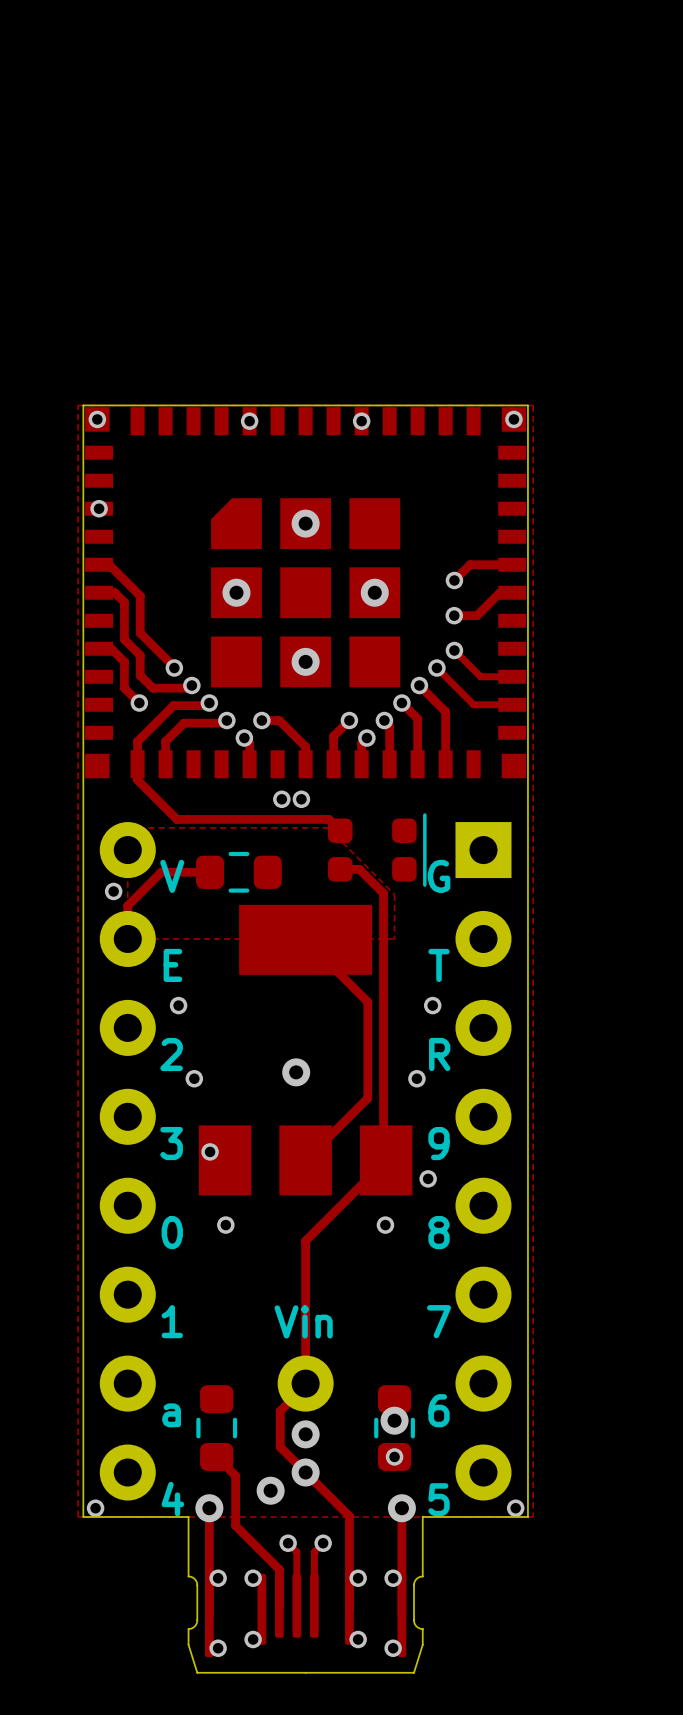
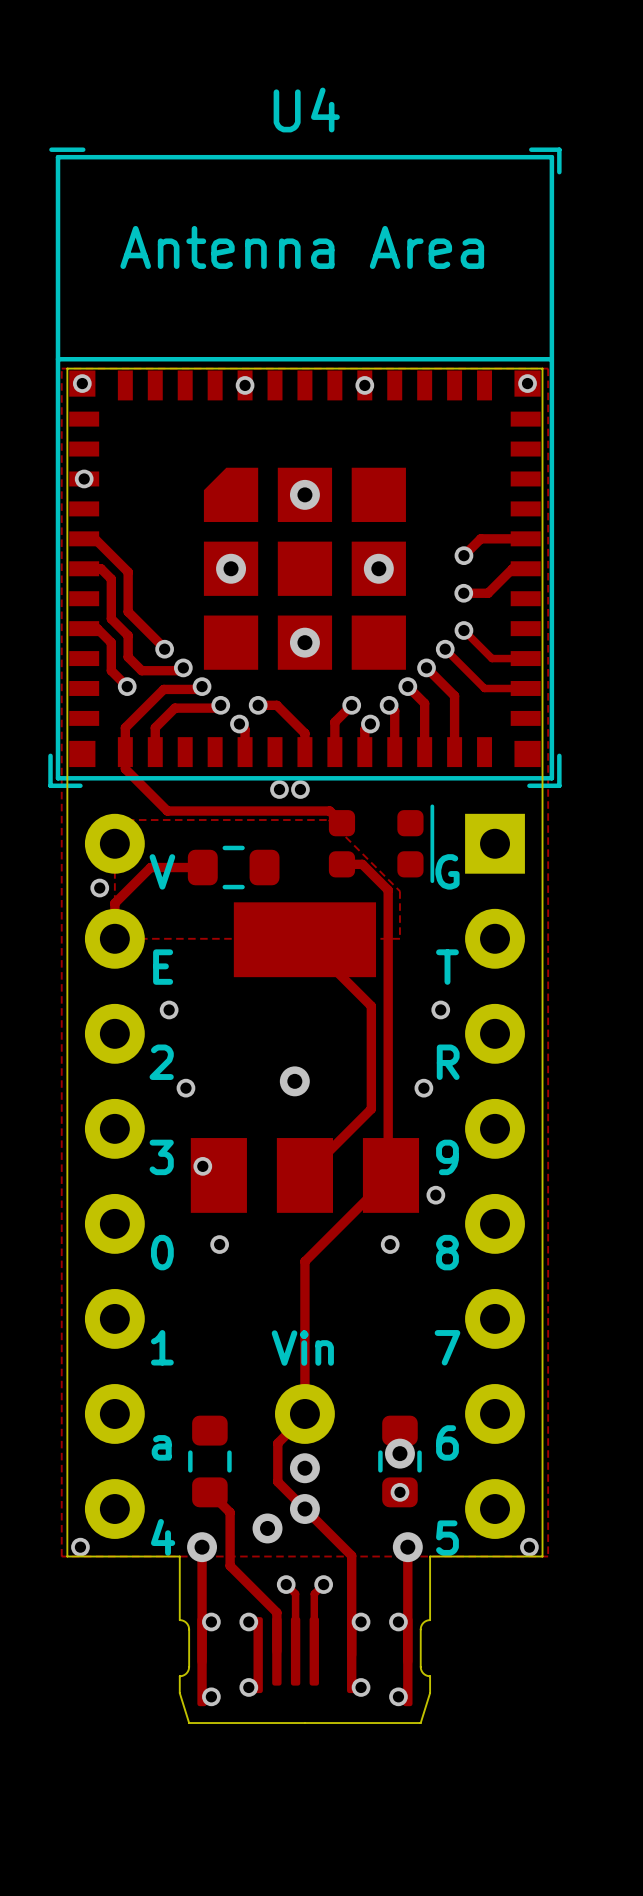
U4: none -> (304, 467)

